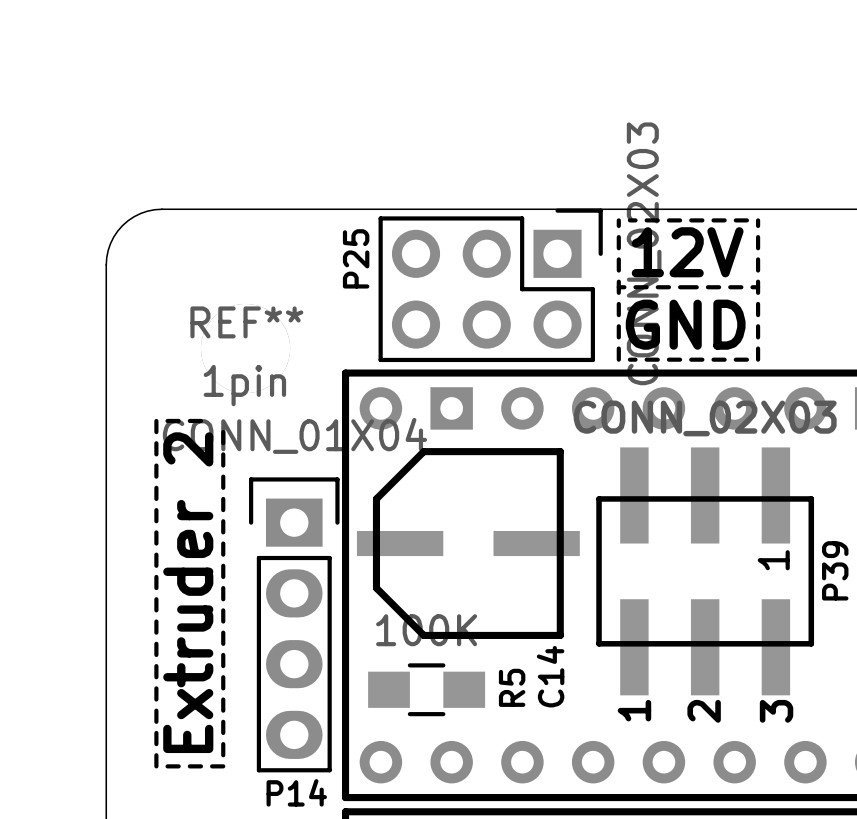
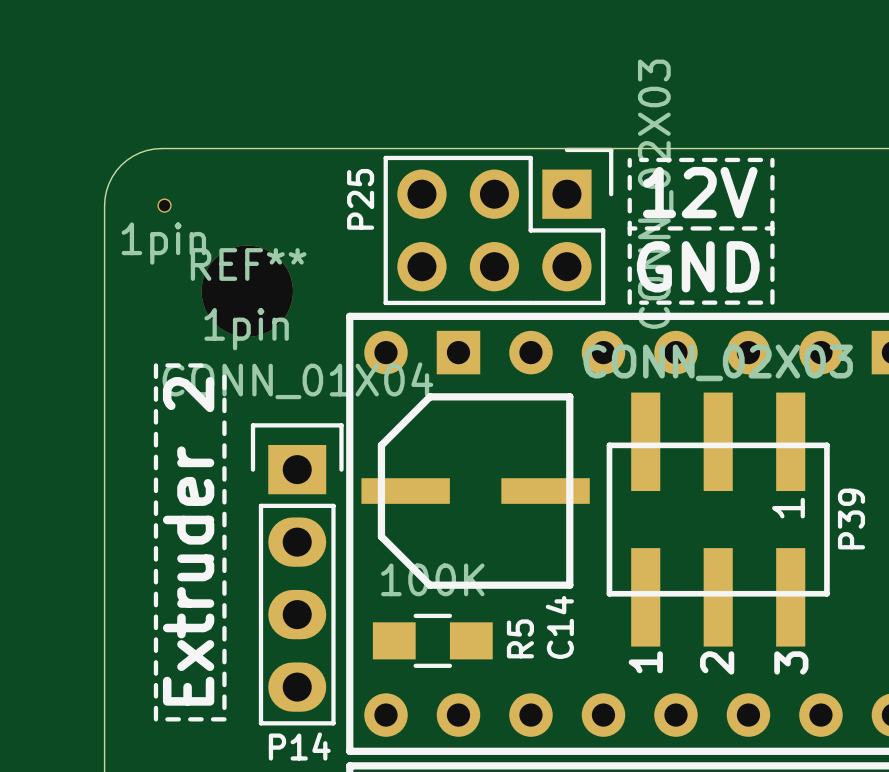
part: none -> 1pin (164, 205)

